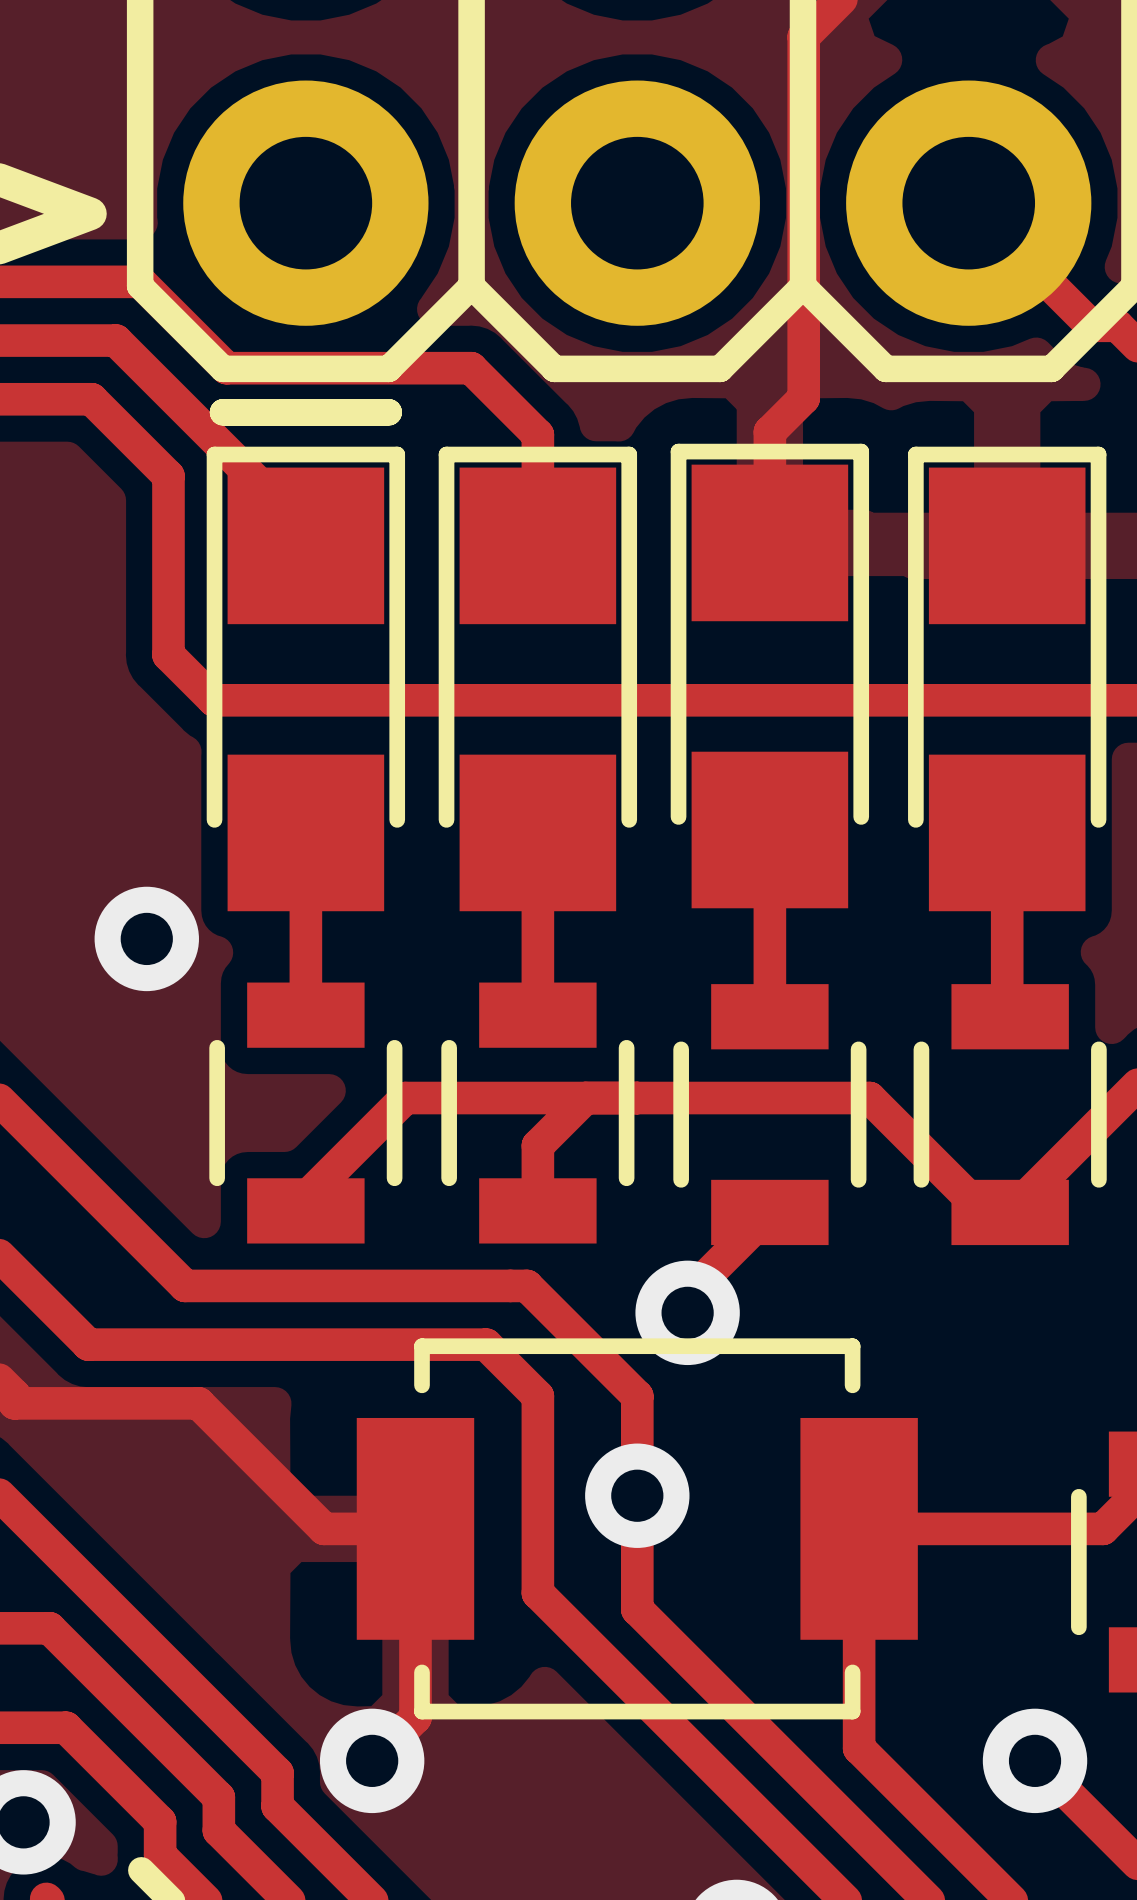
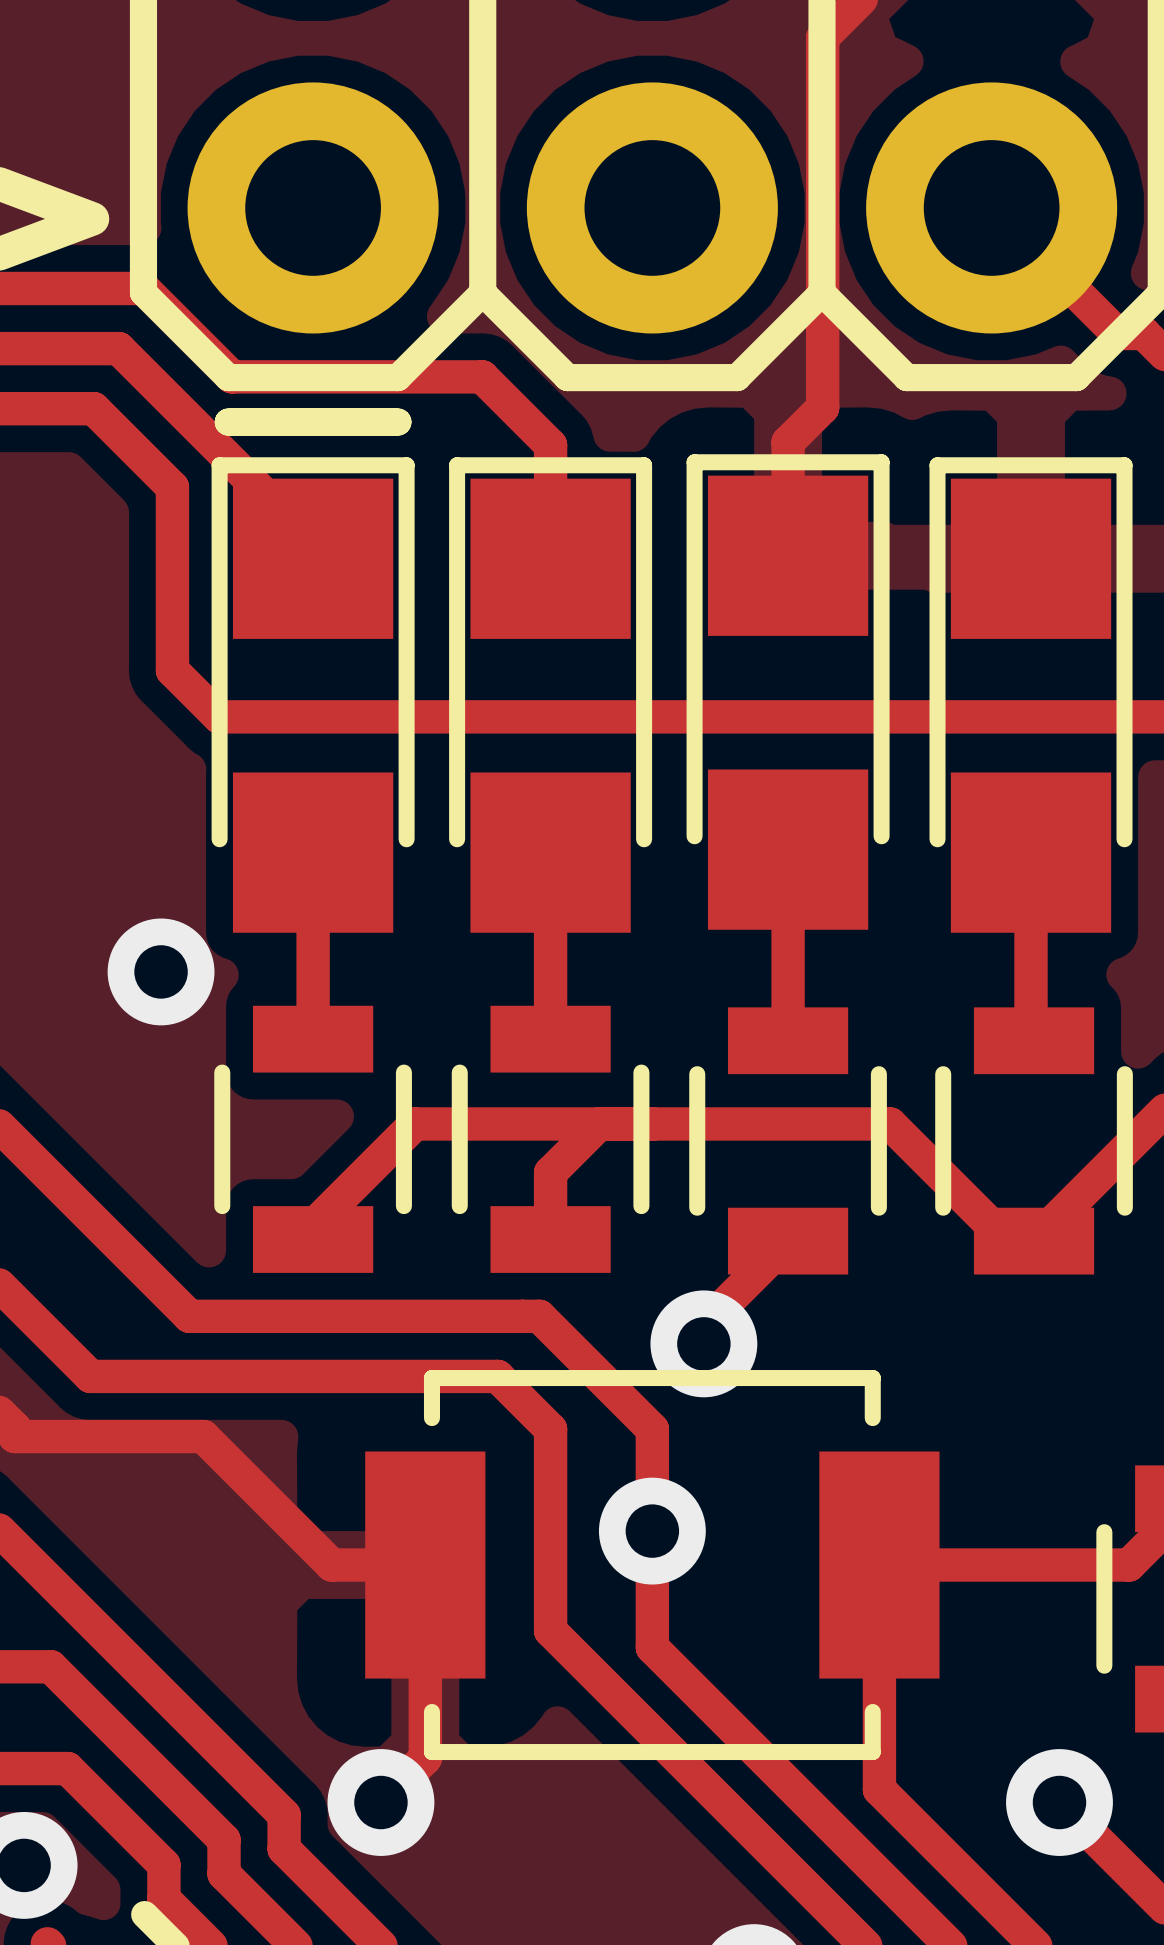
via position: (146, 938) -> (161, 971)

